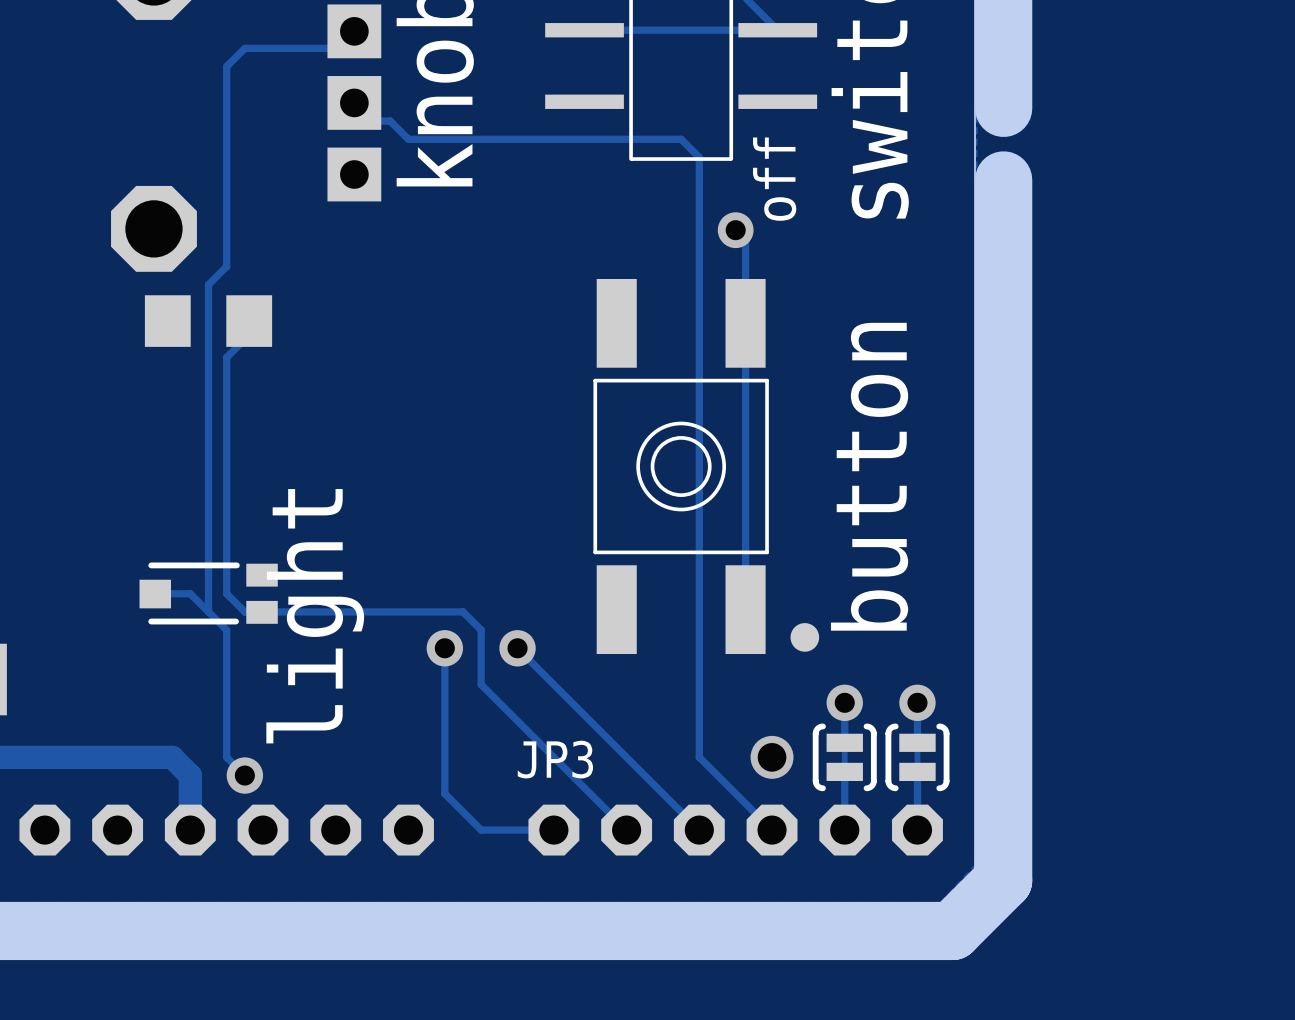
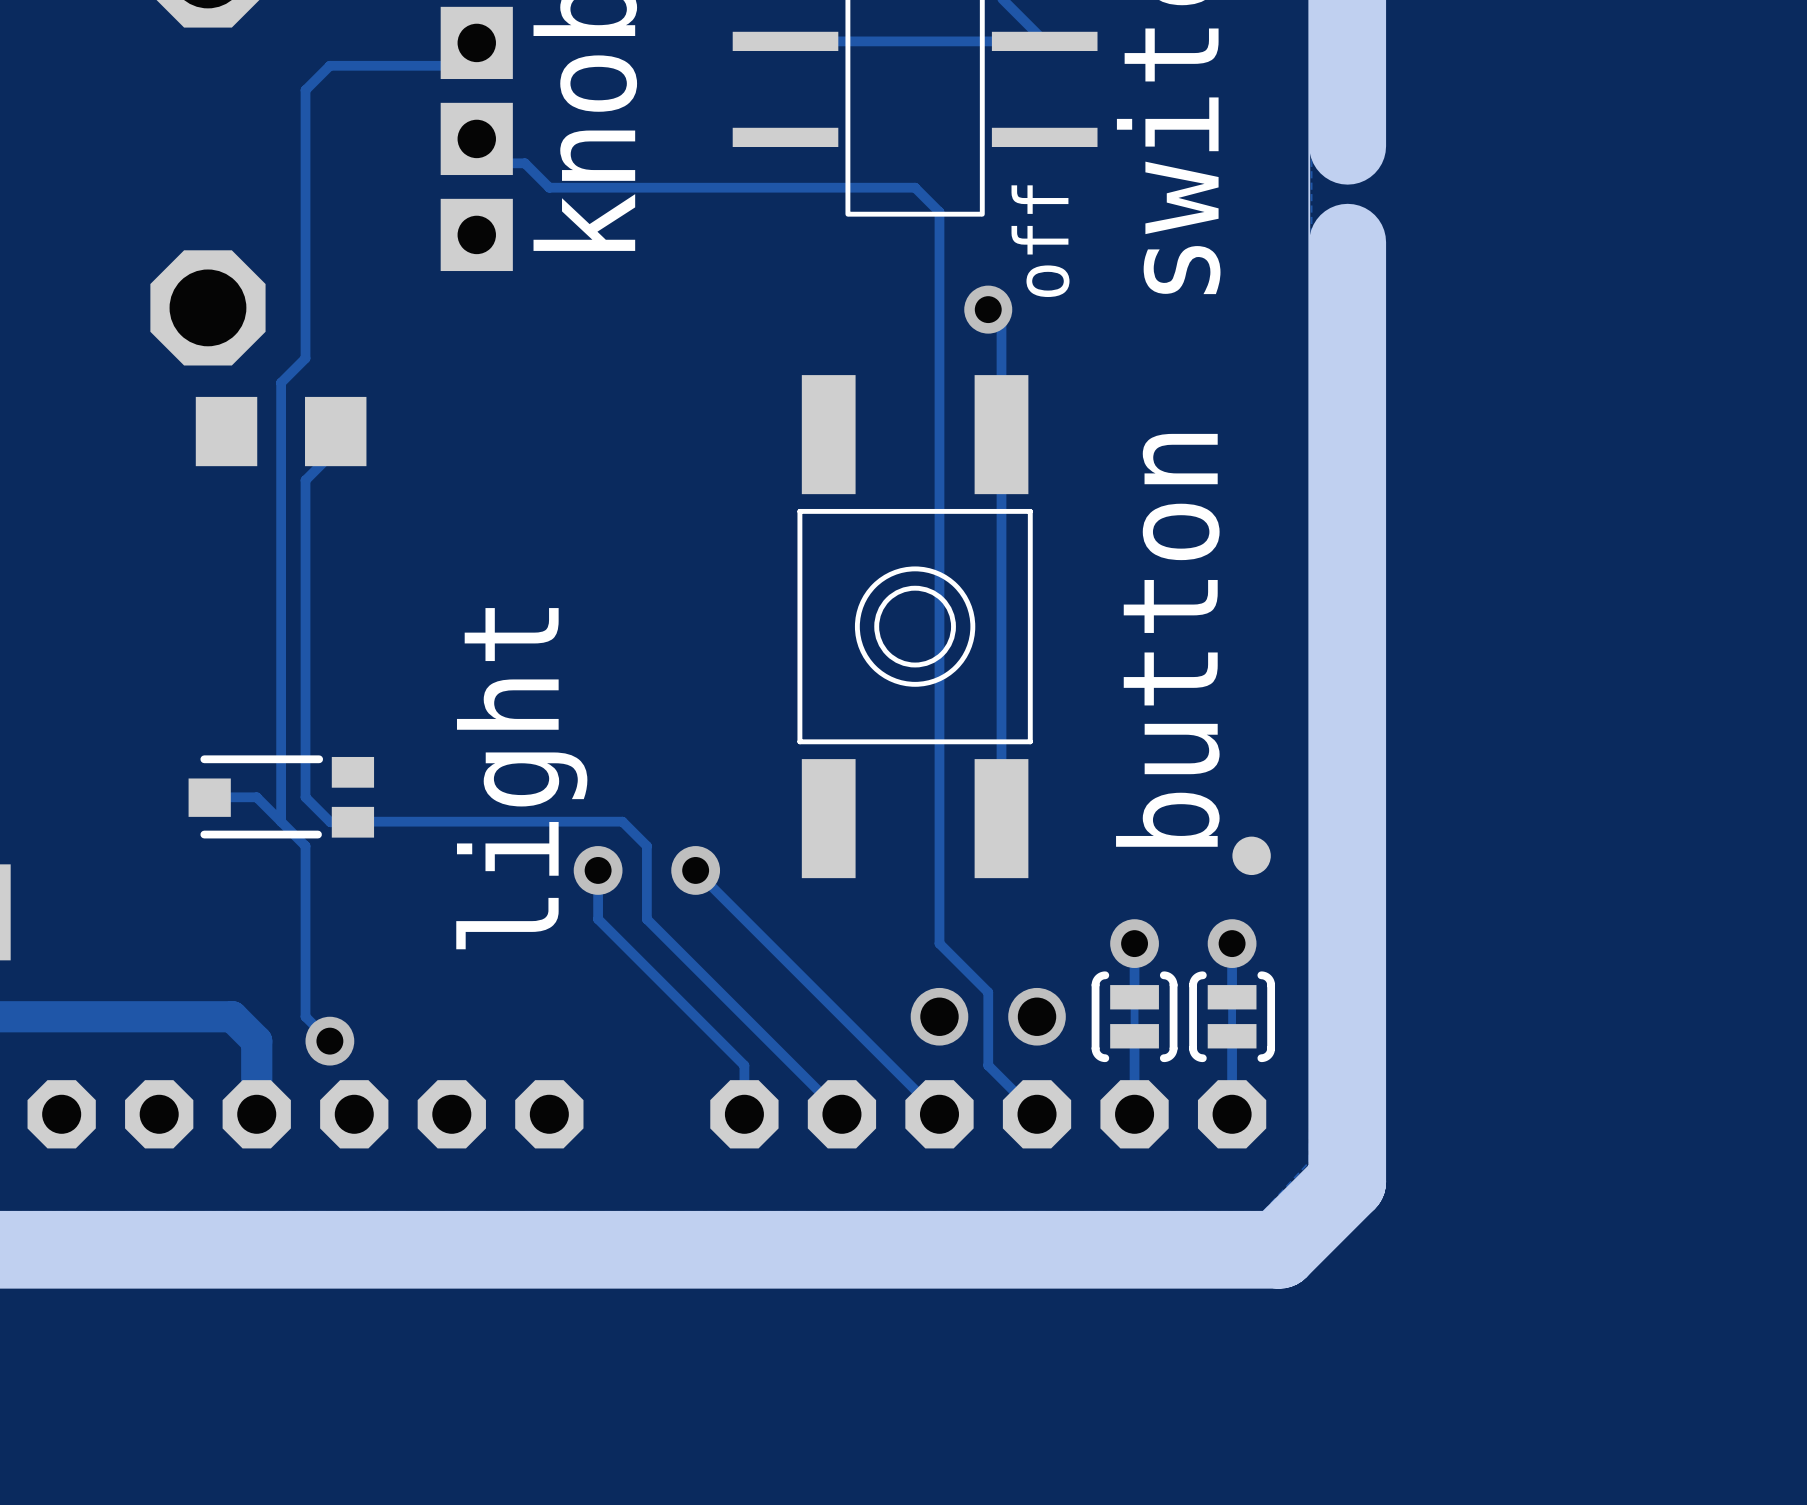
text position: light (315, 616) -> light (521, 778)
part position: (804, 637) -> (1251, 855)
track: (444, 684) (444, 793) (481, 830) (553, 830) -> (598, 919) (744, 1065) (744, 1114)
track: (699, 702) (699, 757) (735, 793) -> (939, 943) (988, 992) (988, 1065)
via: none -> (939, 1016)
JP3 name: JP3 (555, 759) -> none

